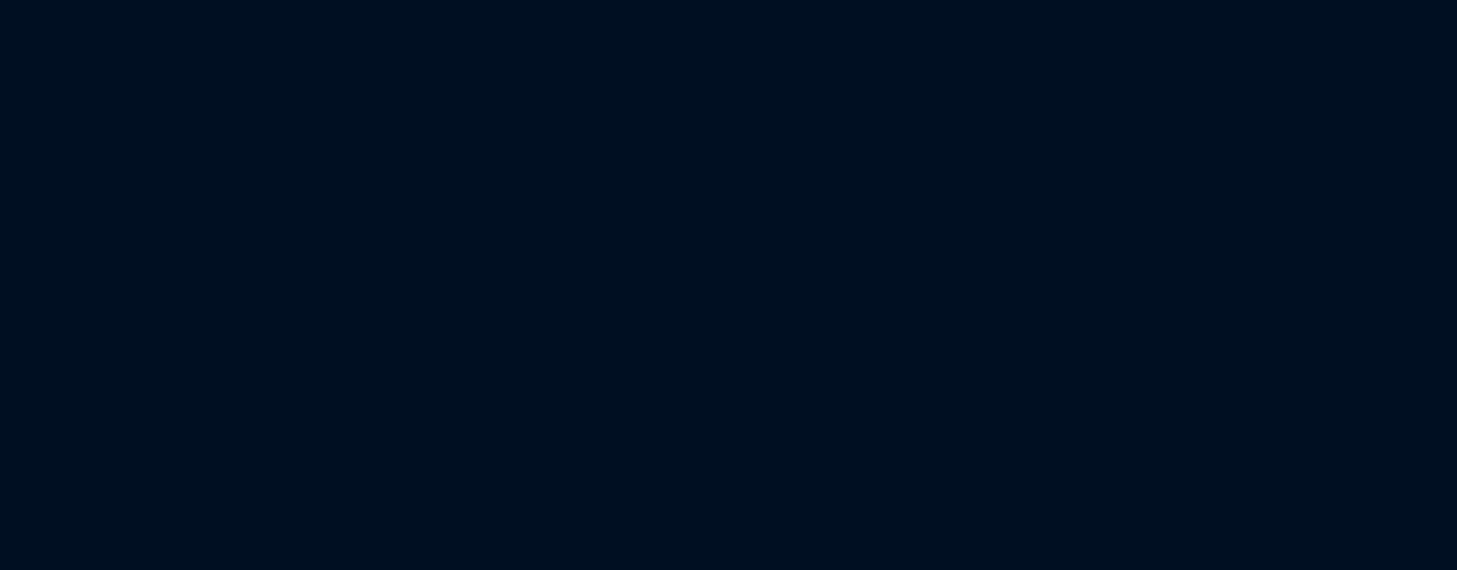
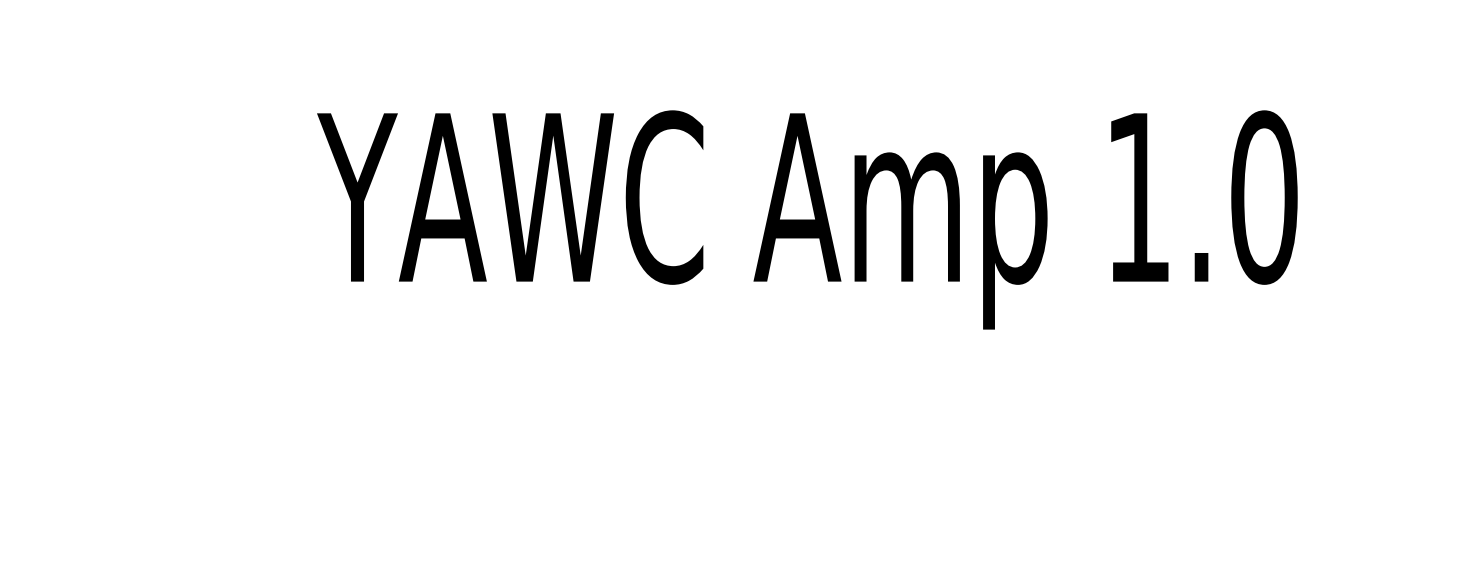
text: none -> YAWC Amp 1.0 (807, 219)

